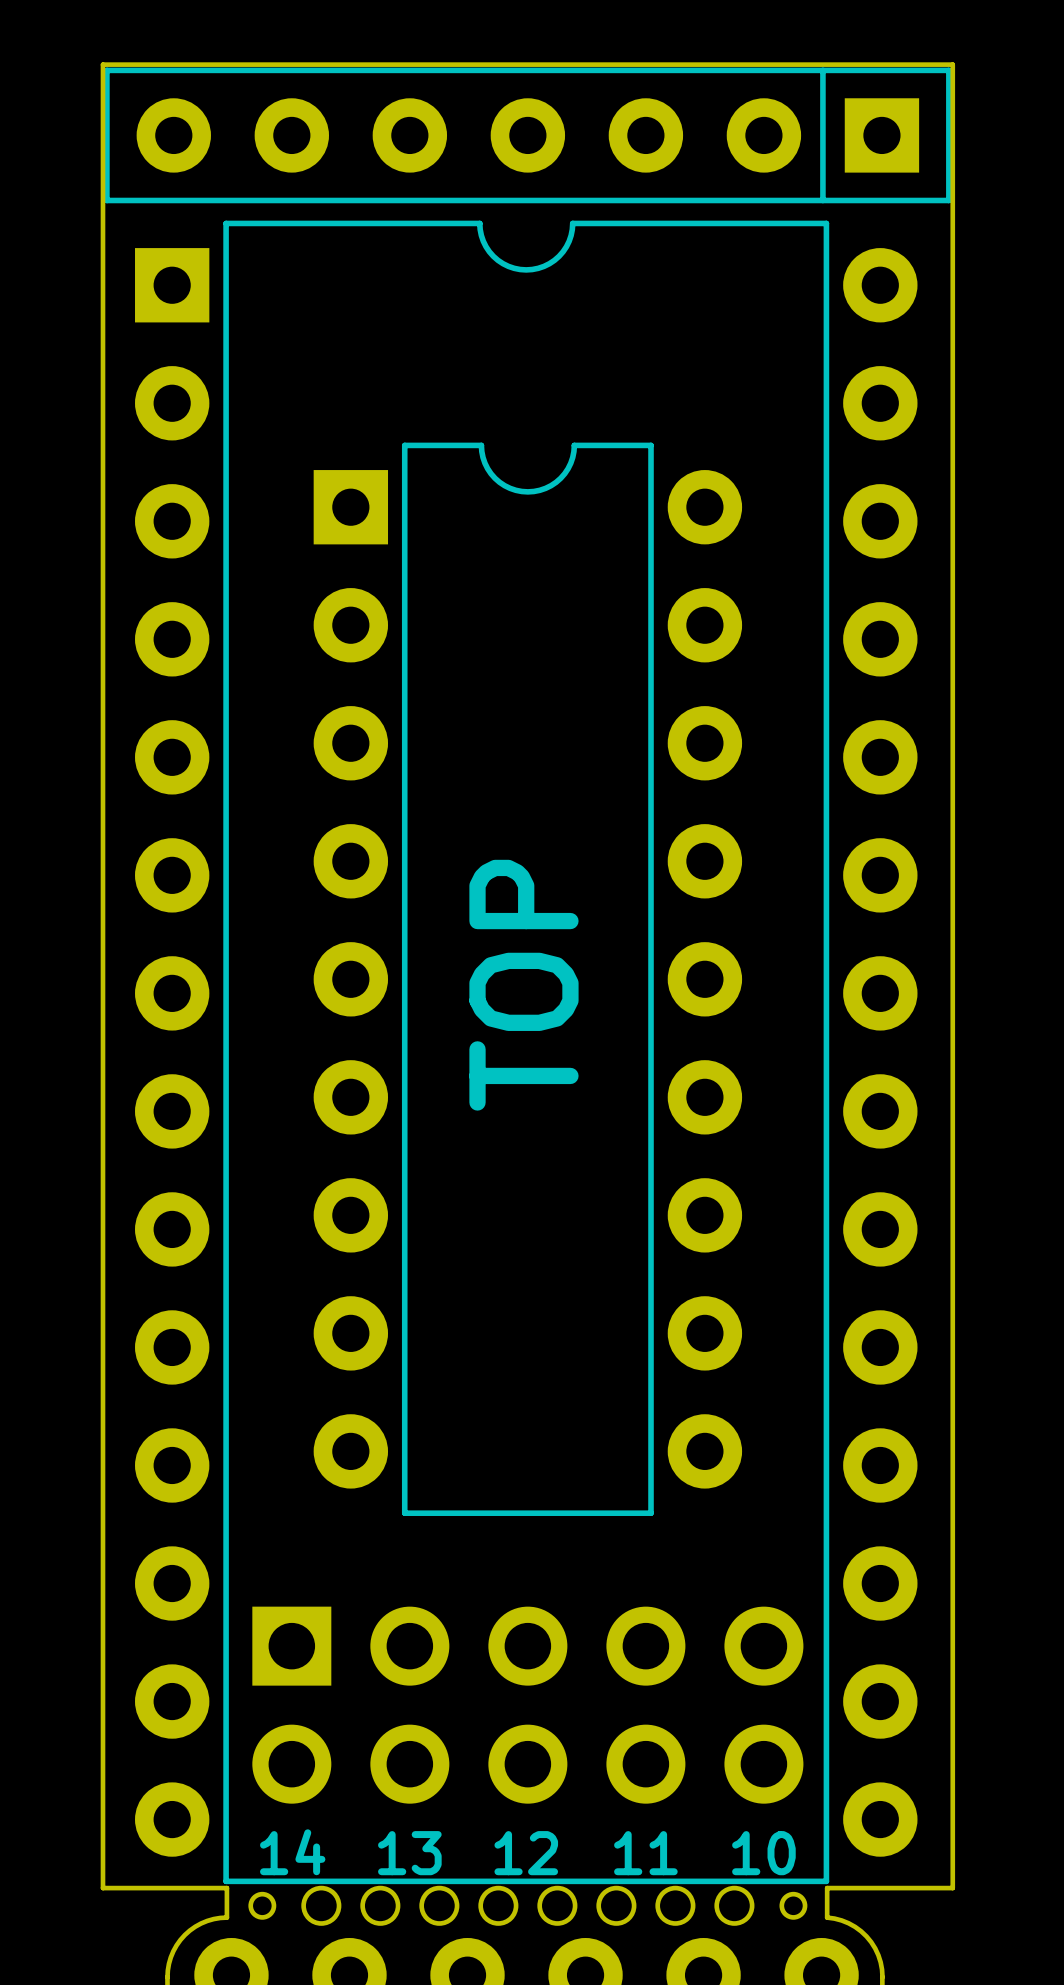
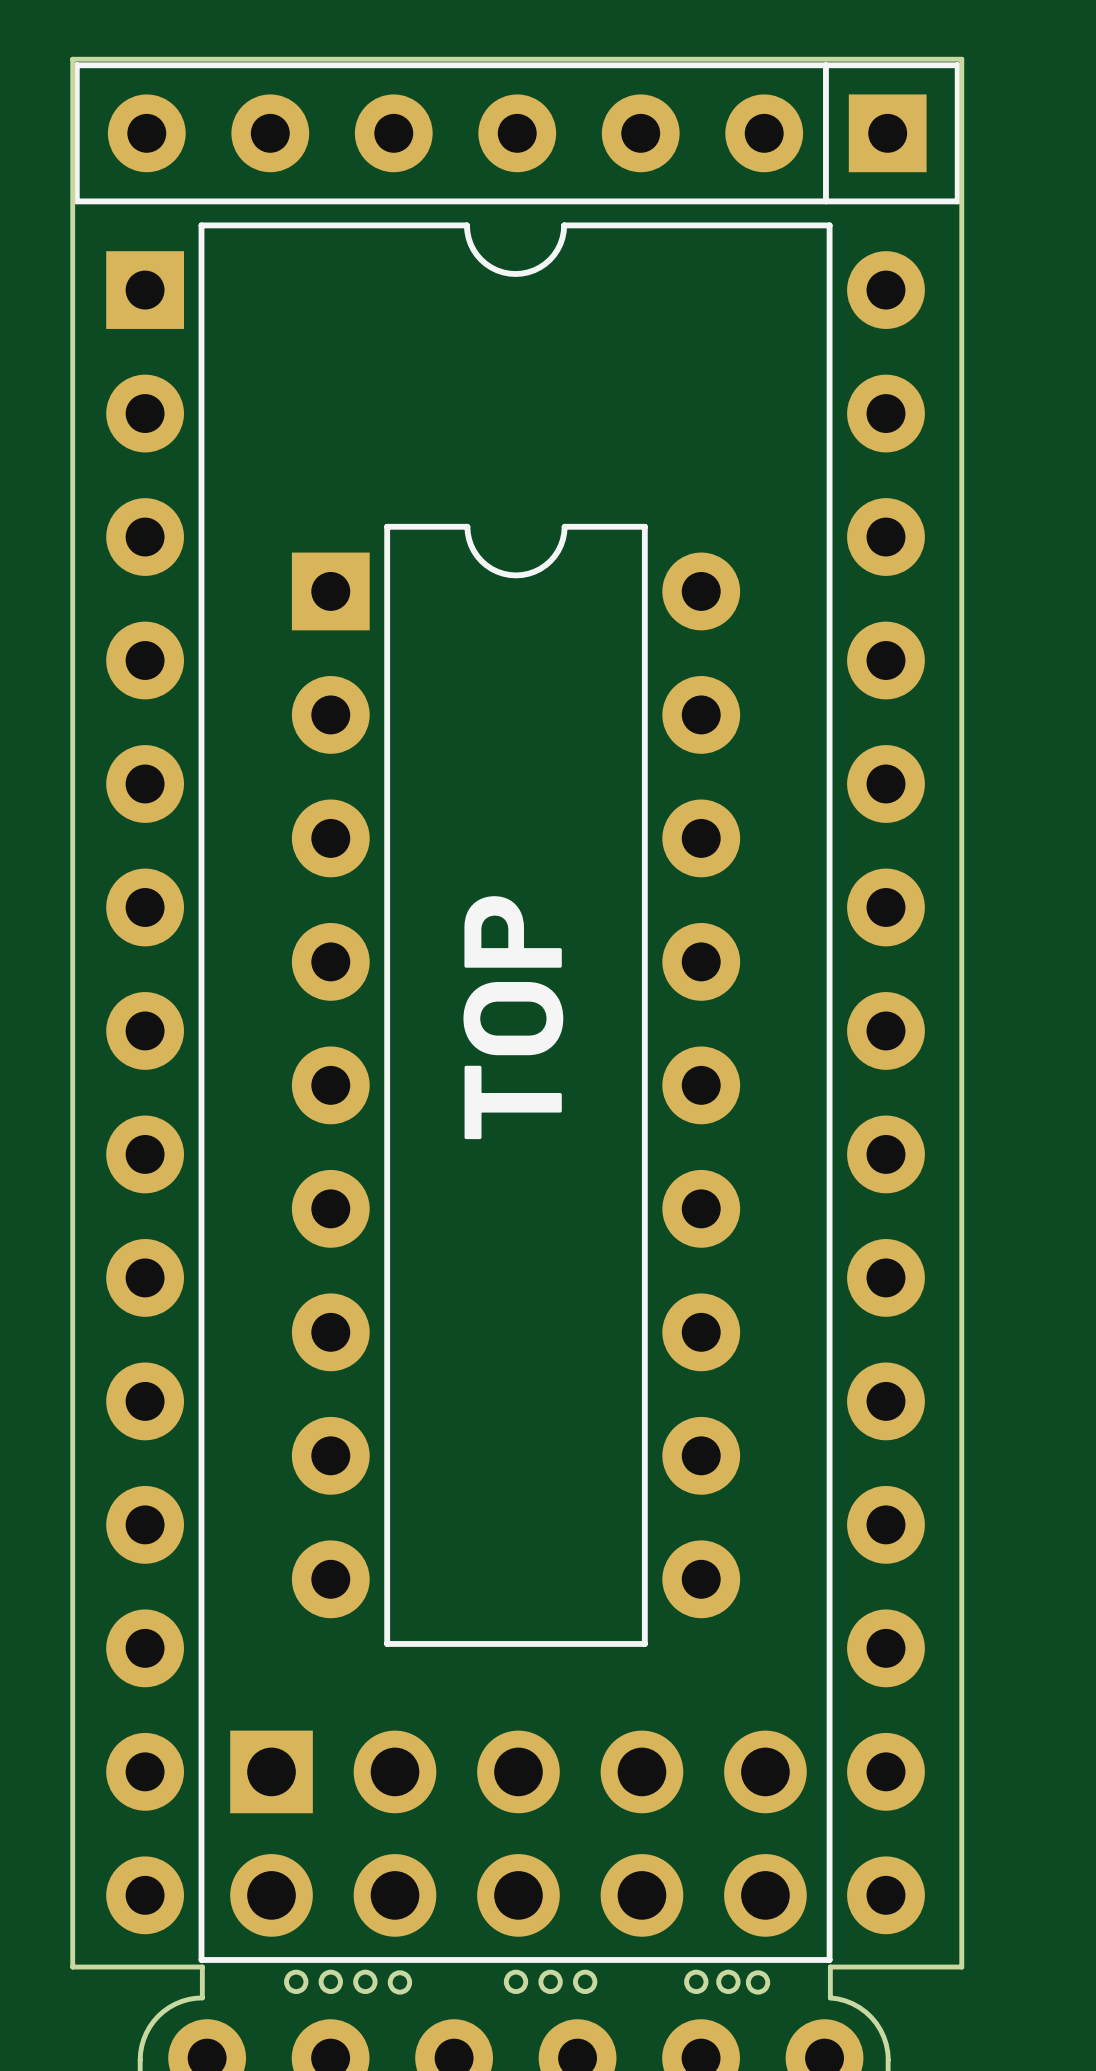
part position: (527, 979) -> (516, 1085)
part position: (527, 1705) -> (518, 1833)
text: 14 (292, 1852) -> none
text: 13 (409, 1853) -> none
text: 12 (526, 1853) -> none
text: 11 (645, 1853) -> none
text: 10 (763, 1853) -> none
round board edge size: [301, 1885, 342, 1926] -> [284, 1969, 309, 1995]
round board edge size: [360, 1885, 401, 1926] -> [353, 1969, 378, 1995]
round board edge size: [419, 1885, 460, 1926] -> [387, 1970, 413, 1995]
round board edge: [478, 1885, 519, 1926] -> none
round board edge size: [537, 1885, 578, 1926] -> [538, 1969, 563, 1995]
round board edge size: [596, 1885, 637, 1926] -> [573, 1969, 598, 1995]
round board edge size: [655, 1885, 696, 1926] -> [684, 1969, 709, 1995]
round board edge size: [714, 1885, 755, 1926] -> [716, 1969, 741, 1995]
round board edge: none -> [318, 1969, 343, 1995]
round board edge: none -> [503, 1969, 529, 1995]
round board edge: [248, 1891, 277, 1920] -> none
round board edge: none -> [745, 1970, 771, 1995]
round board edge: [779, 1891, 808, 1920] -> none

